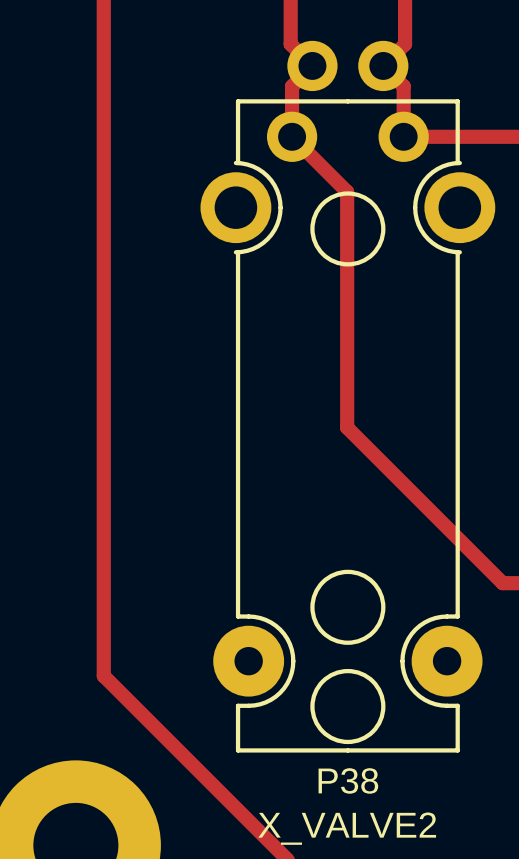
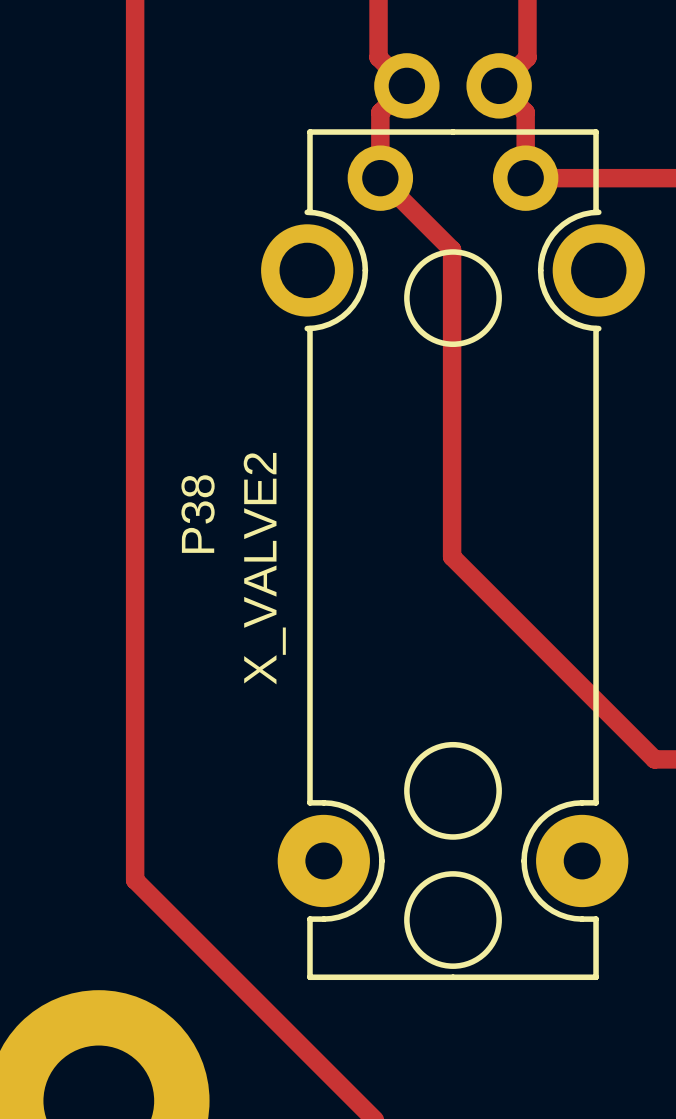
P38 name rotation: 0° (348, 780) -> 90° counterclockwise (198, 514)
P38 name position: P38 (348, 780) -> P38 (198, 514)
P38 value rotation: 0° (347, 828) -> 90° counterclockwise (264, 568)
P38 value position: X_VALVE2 (347, 828) -> X_VALVE2 (264, 568)

